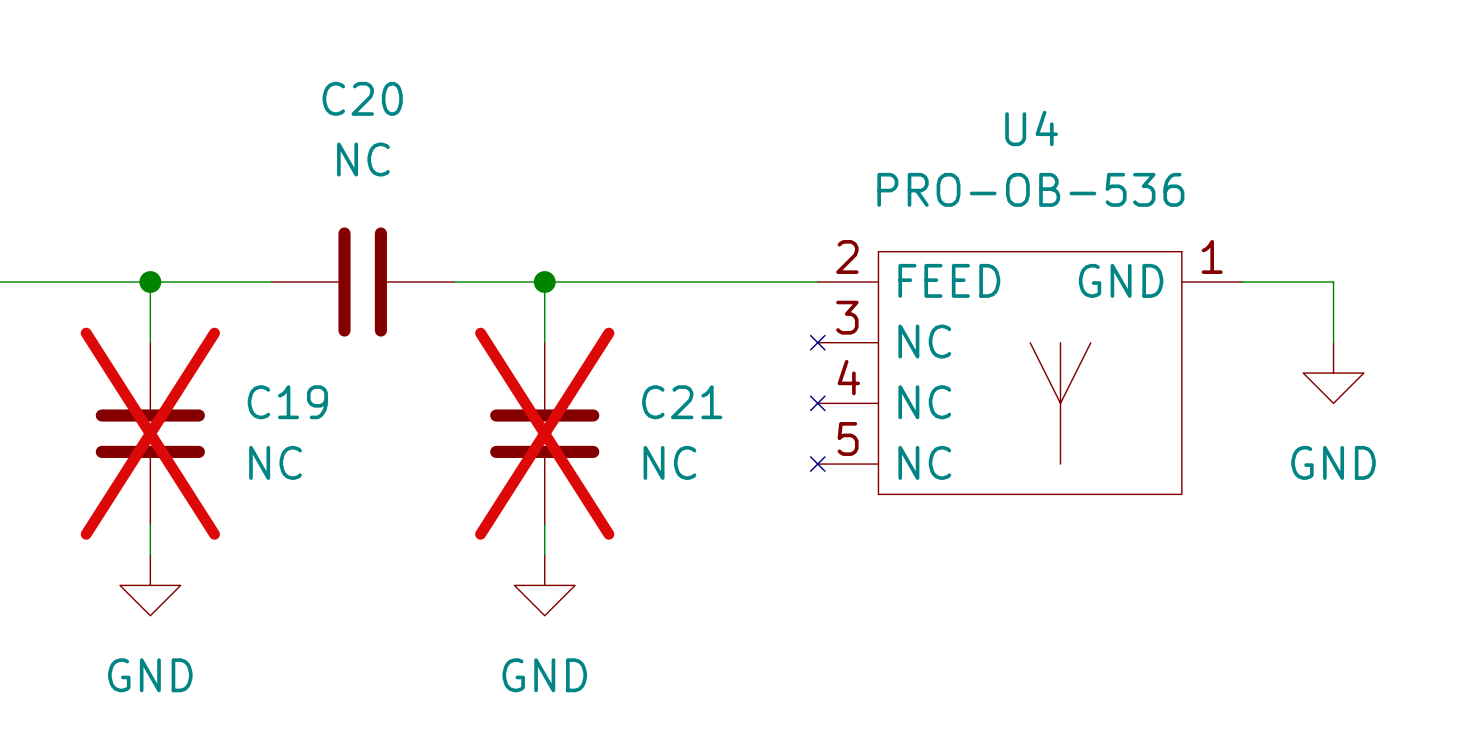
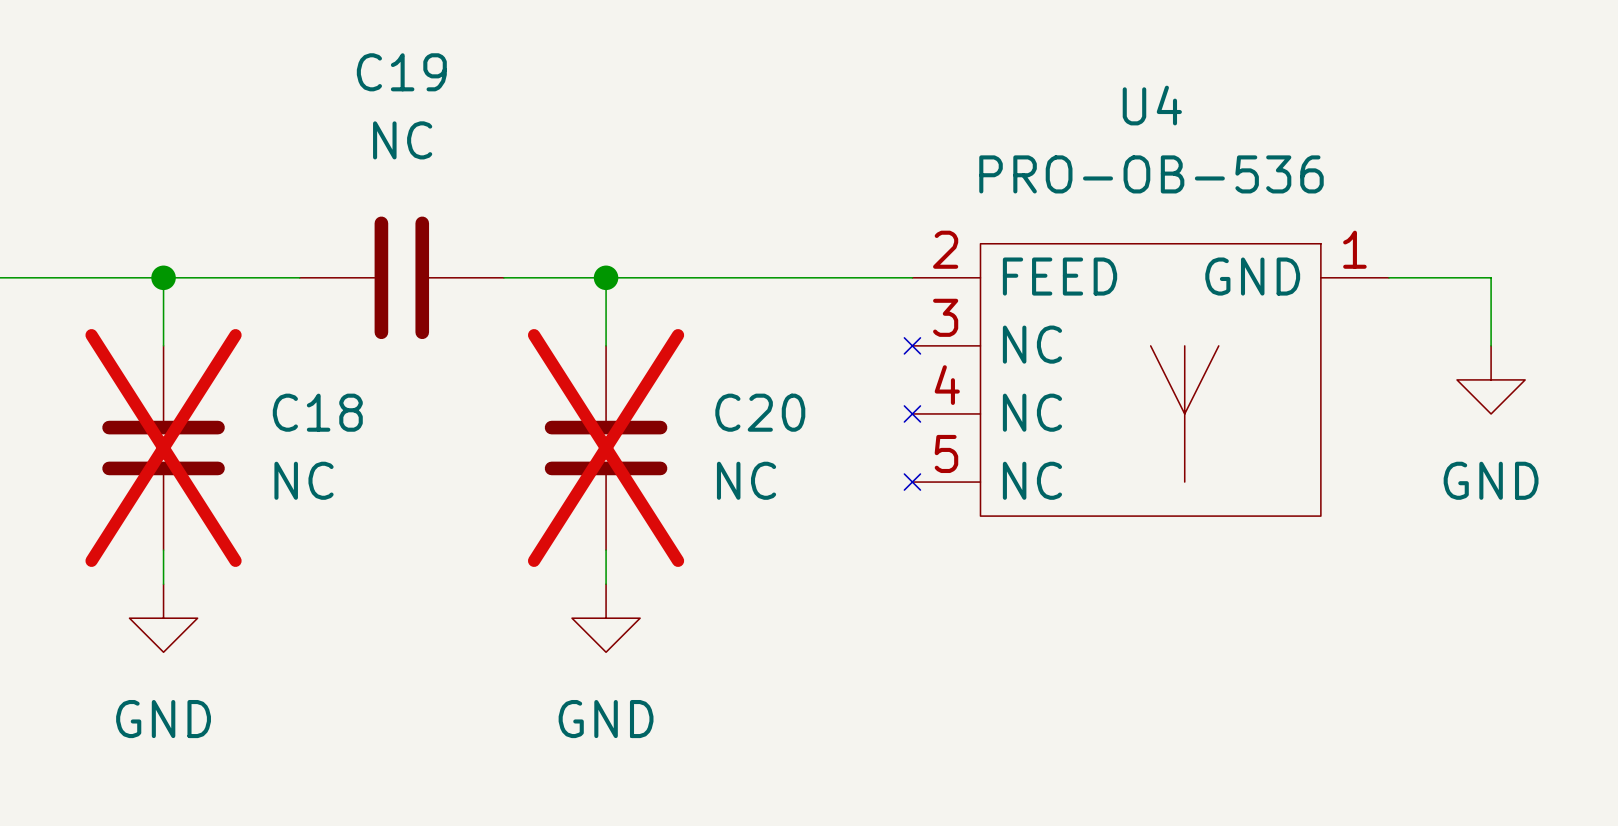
C20 name: C20 (362, 98) -> C19 (401, 72)
C19 name: C19 (287, 402) -> C18 (317, 412)
C21 name: C21 (682, 402) -> C20 (760, 412)

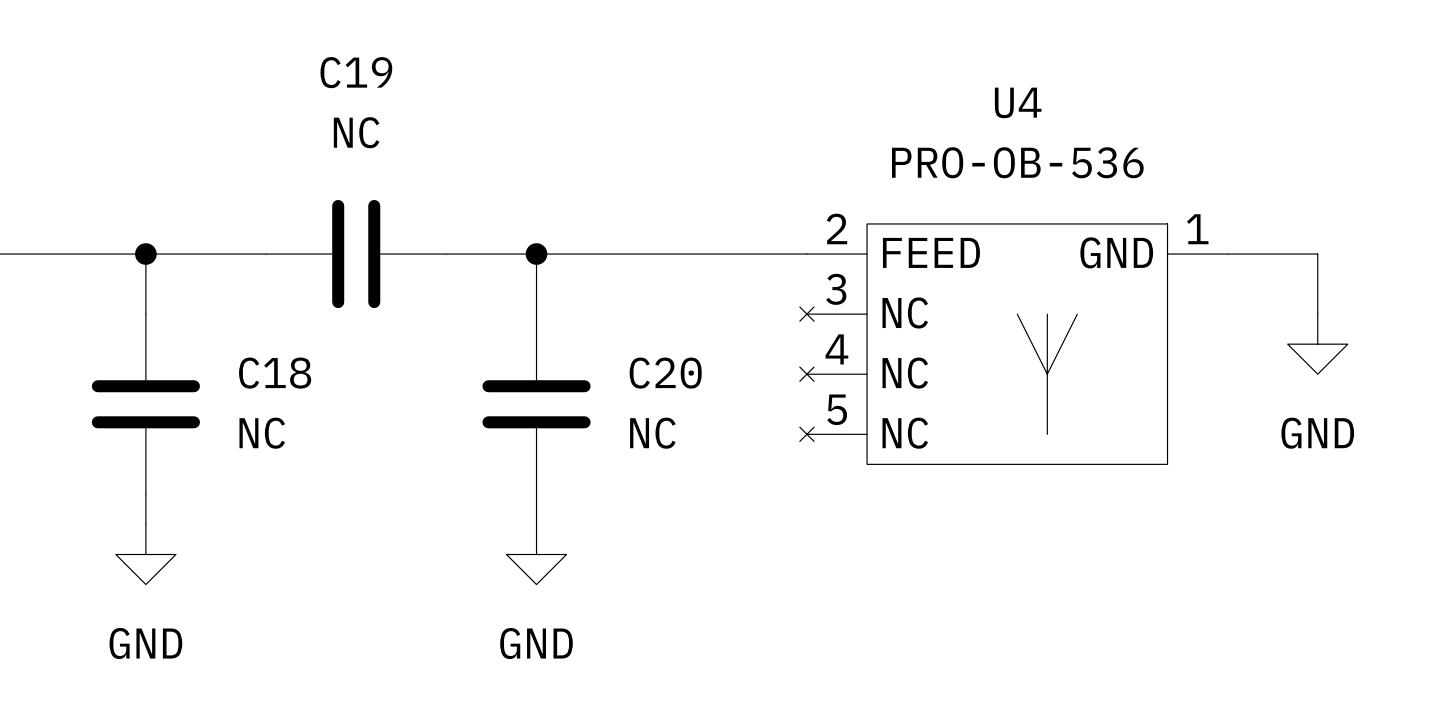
C18 do-not-place cross: (163, 448) -> none
C20 do-not-place cross: (606, 448) -> none

